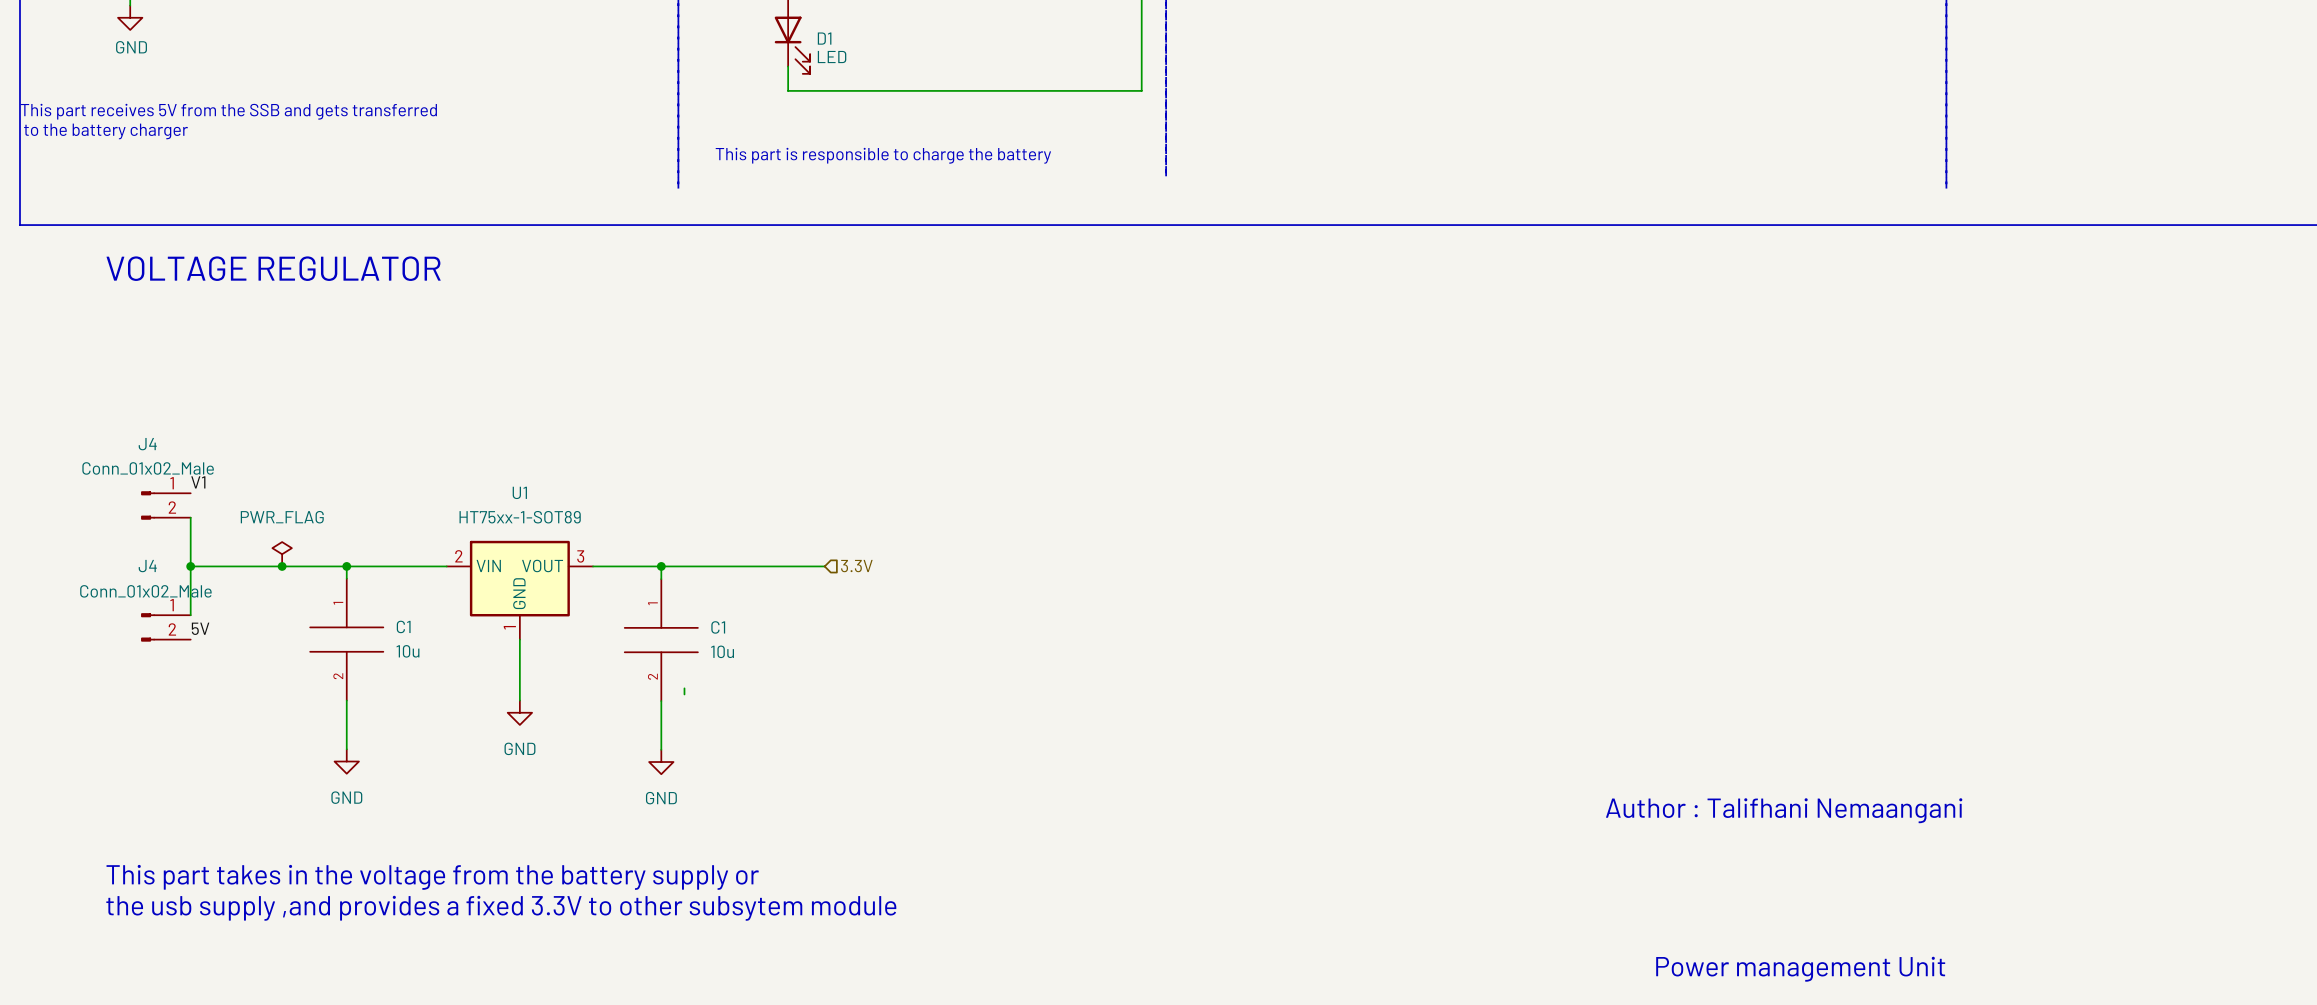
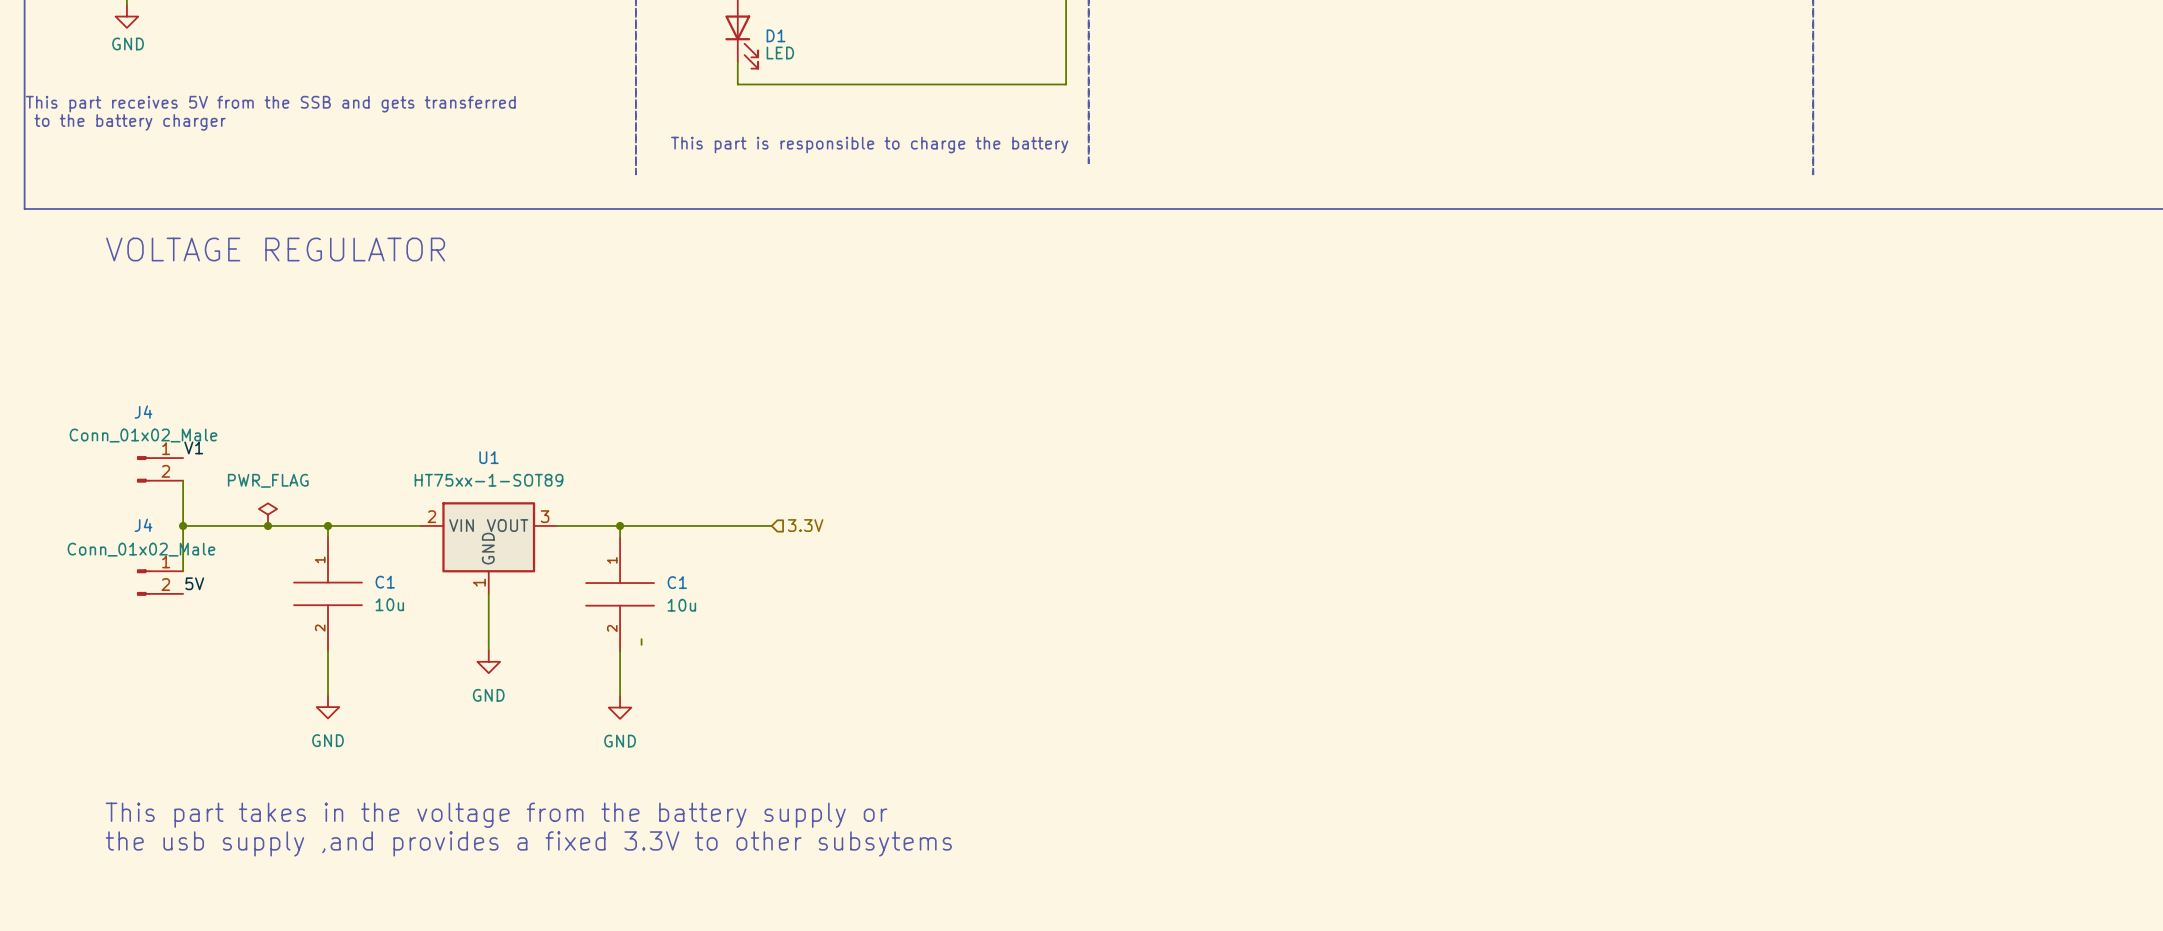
text: Author : Talifhani Nemaangani (1784, 810) -> none
text: the usb supply ,and provides a fixed 3.3V to other subsytem module (501, 908) -> the usb supply ,and provides a fixed 3.3V to other subsytems (528, 843)
text: Power management Unit (1800, 969) -> none

